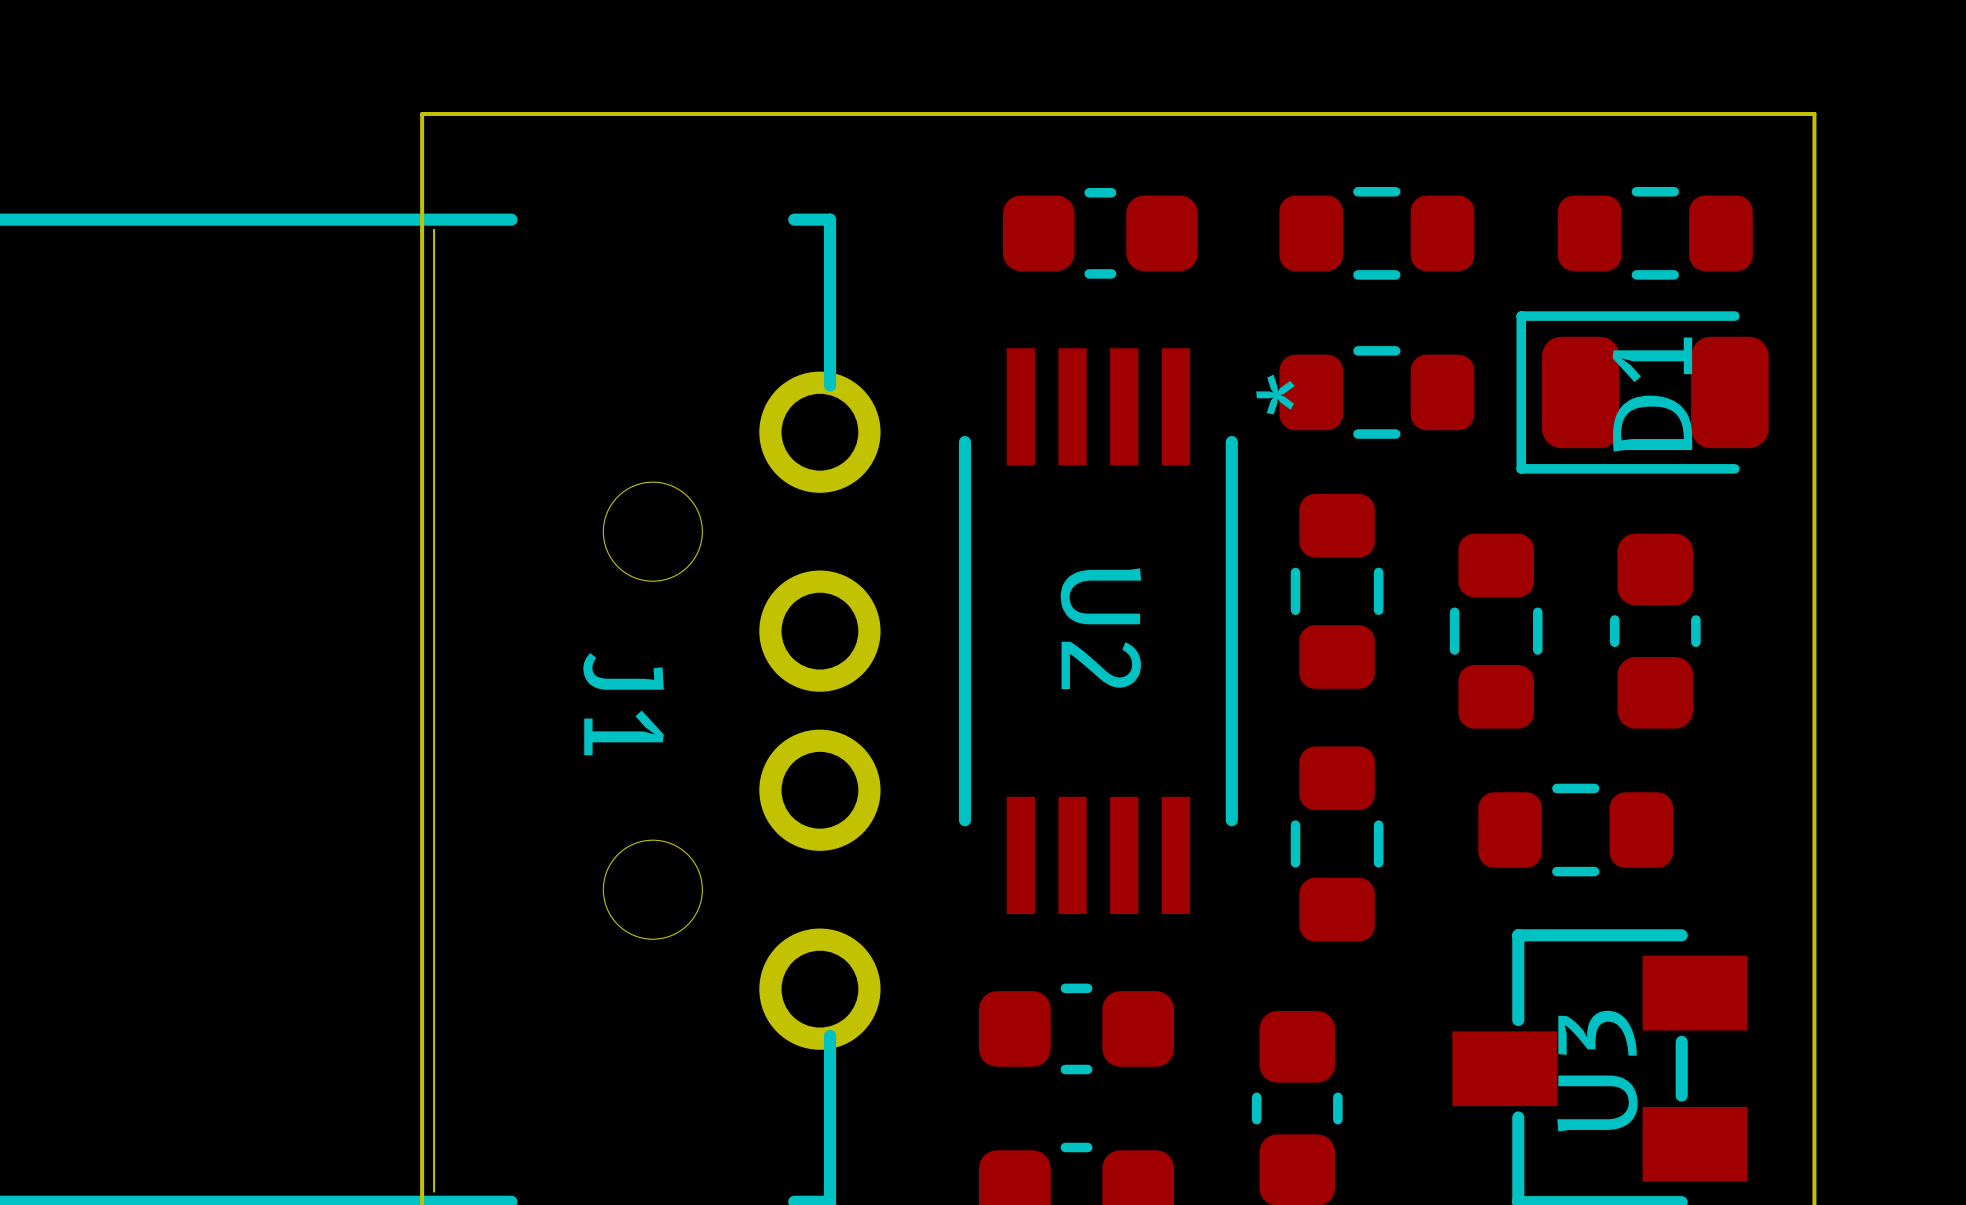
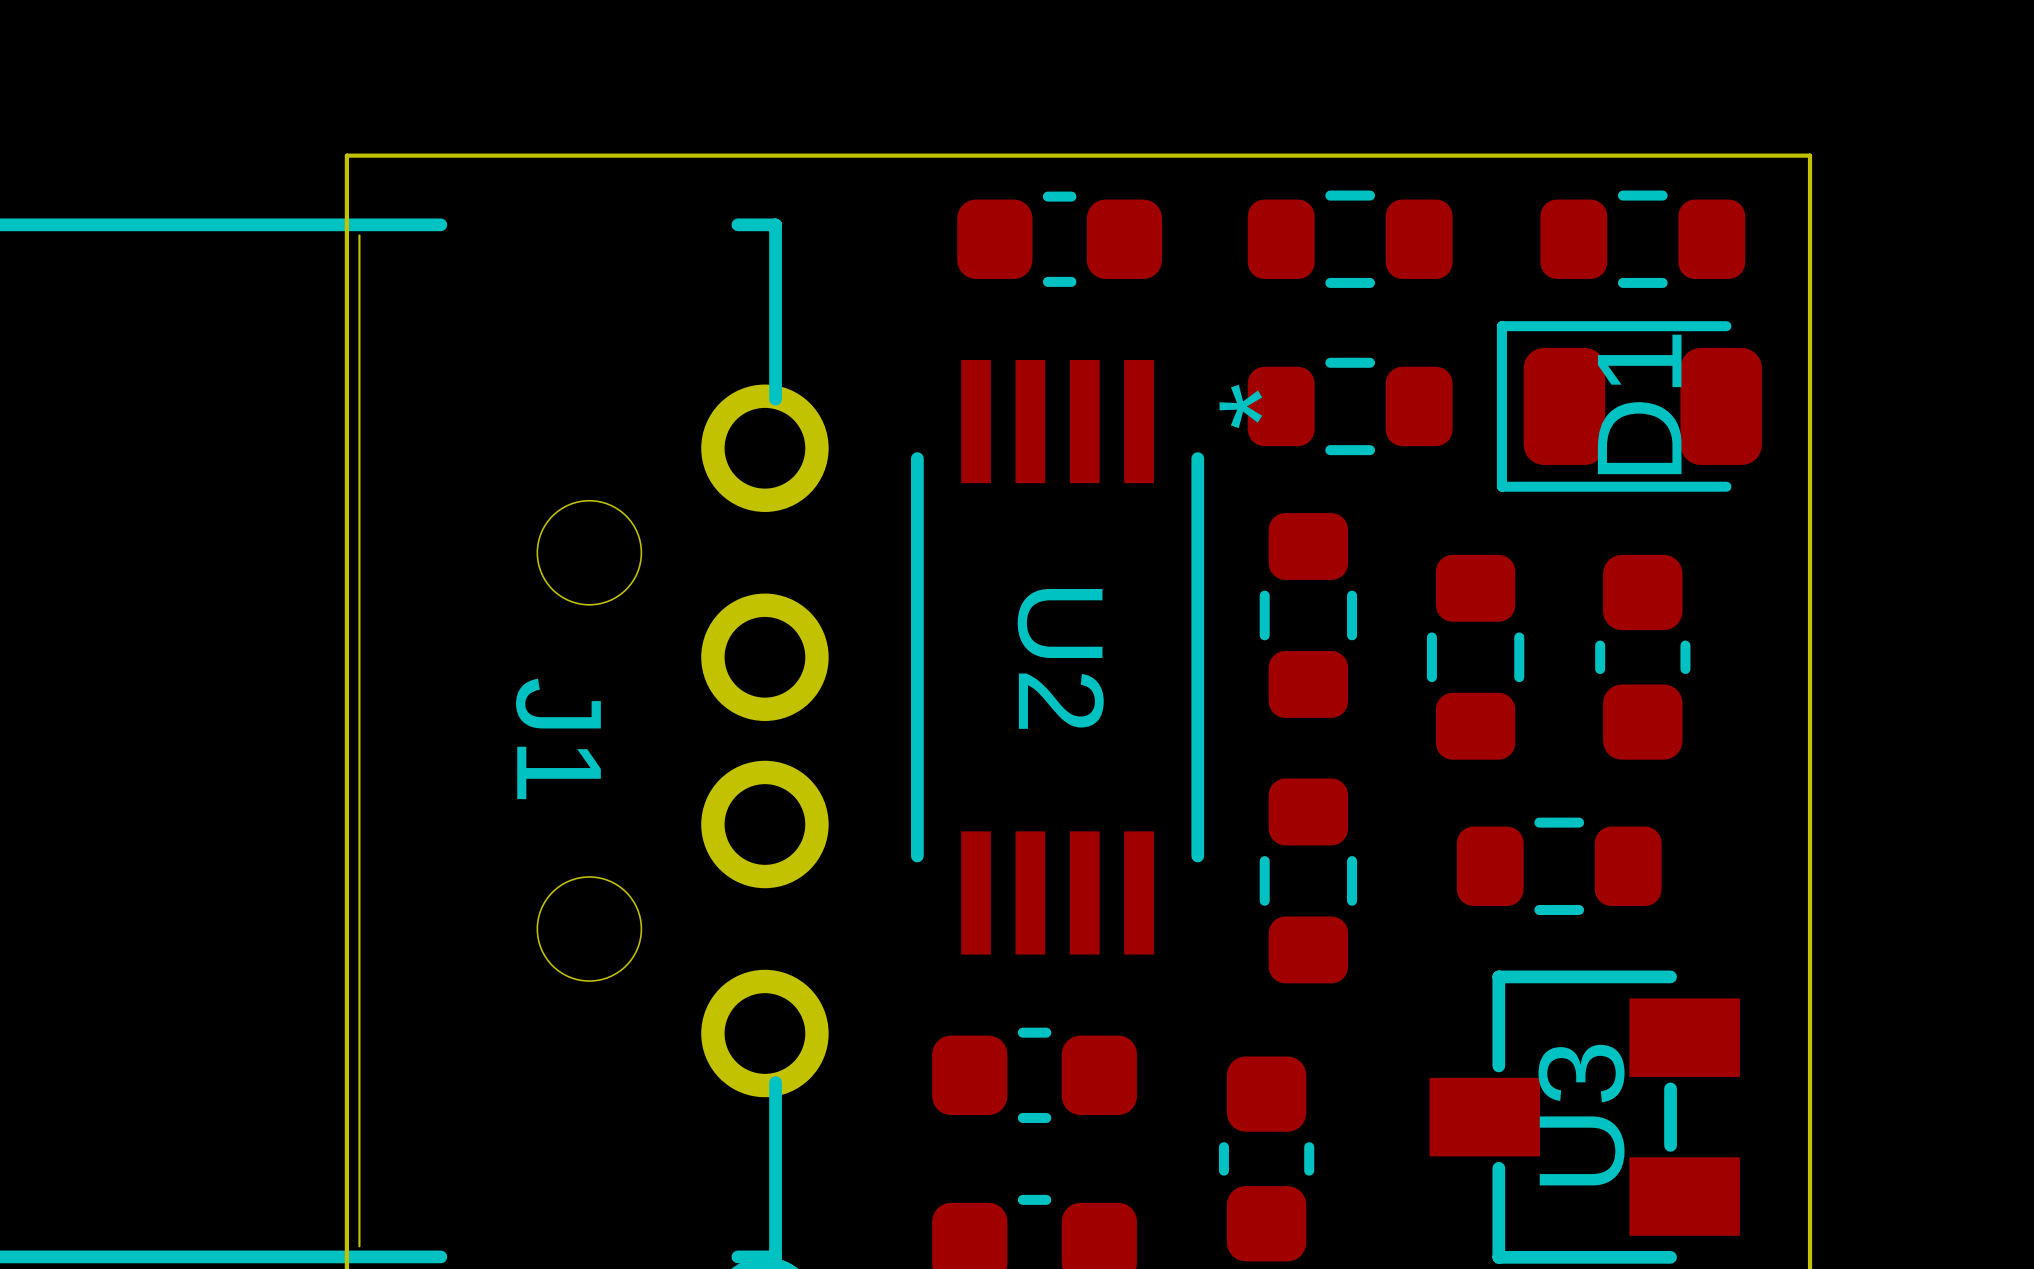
board edge: (422, 153) (422, 113) (1814, 113) (1814, 153) -> (346, 155) (1810, 155)

